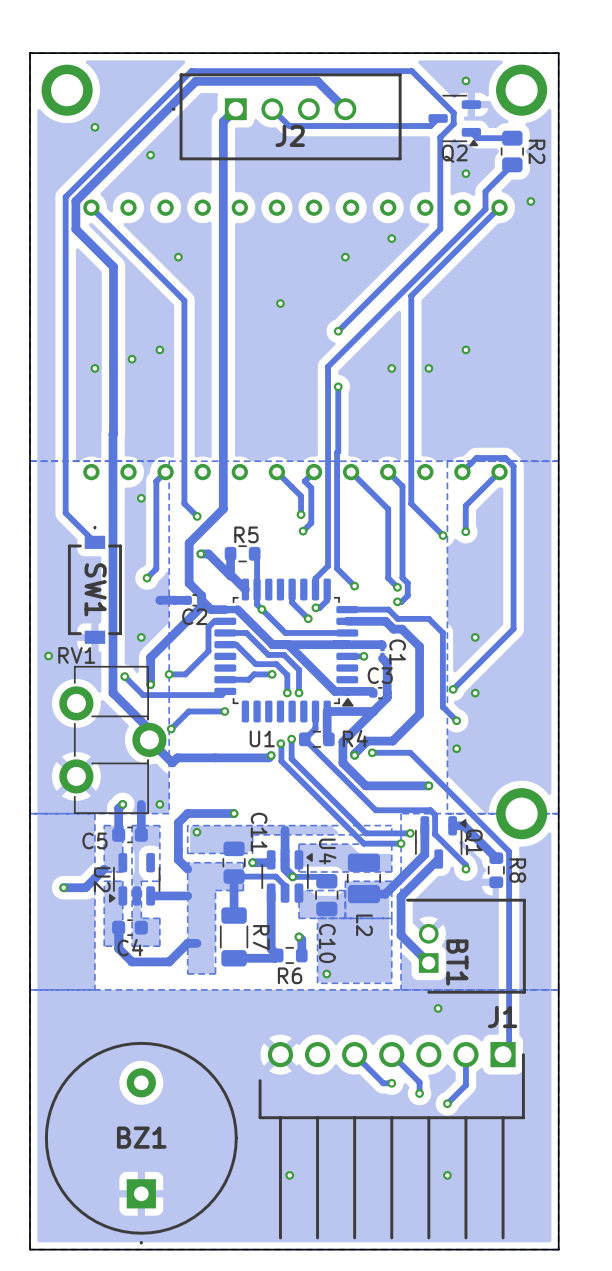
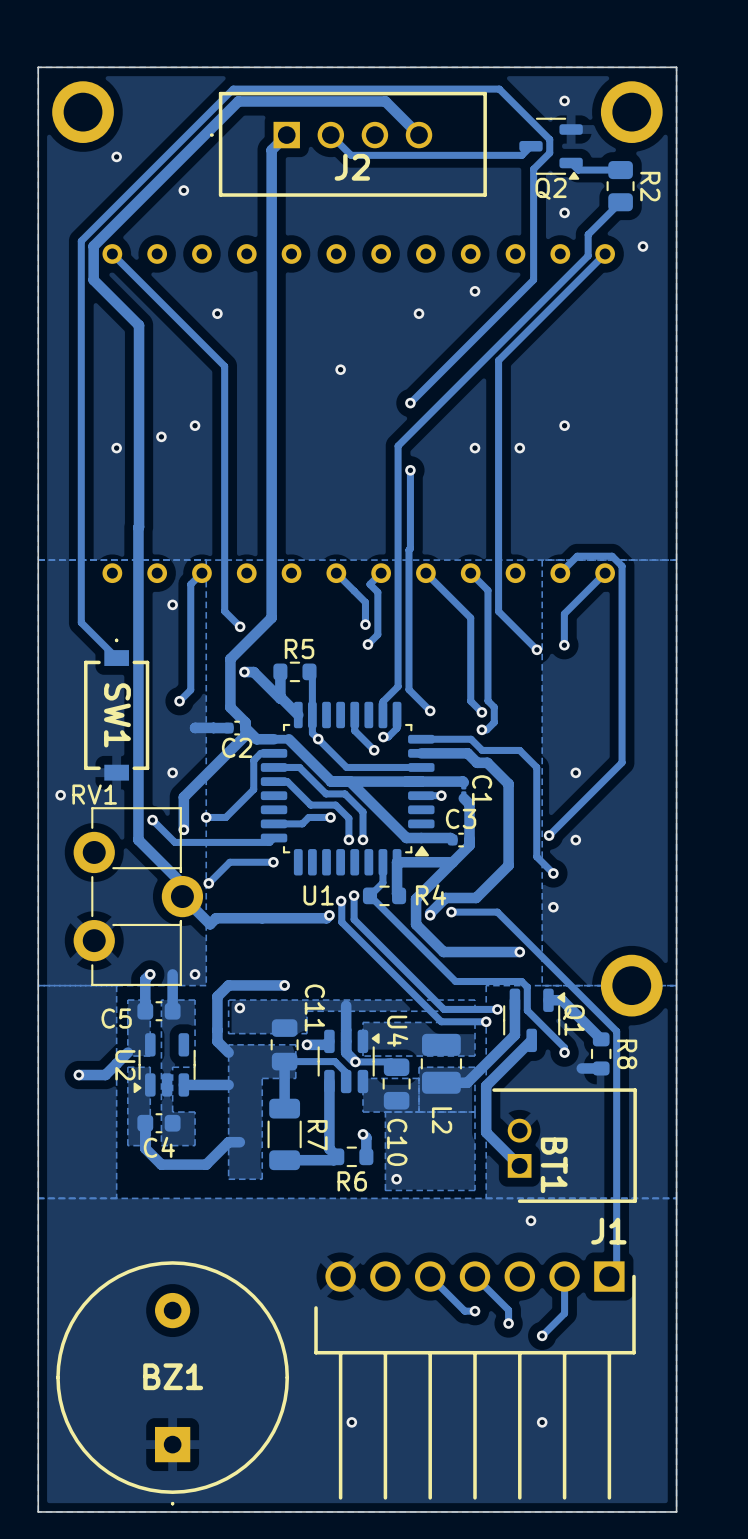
track: none -> (601, 1068) (581, 1068)

